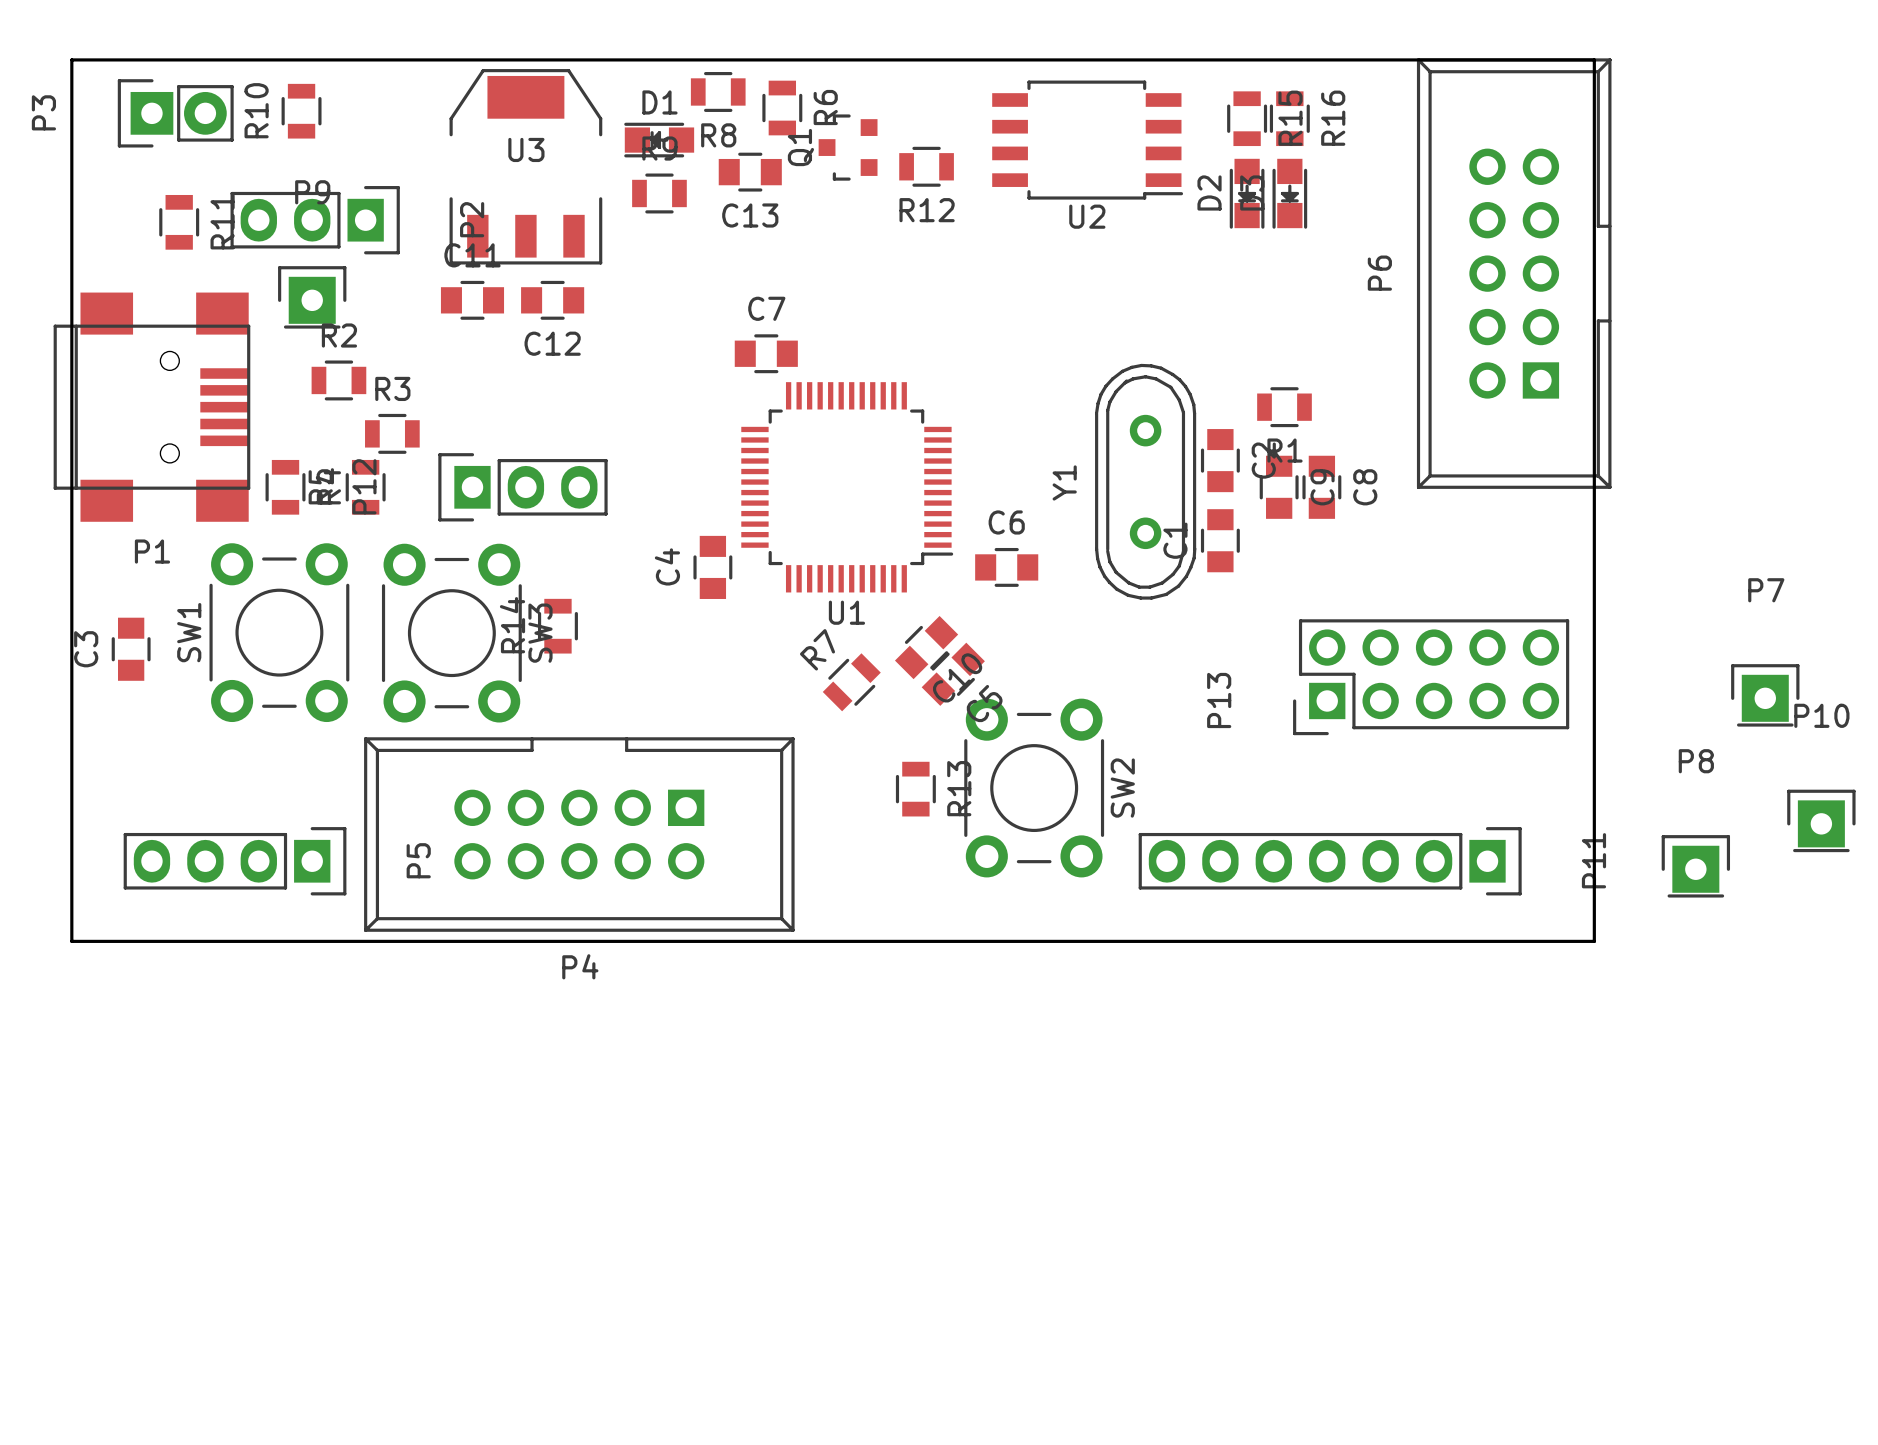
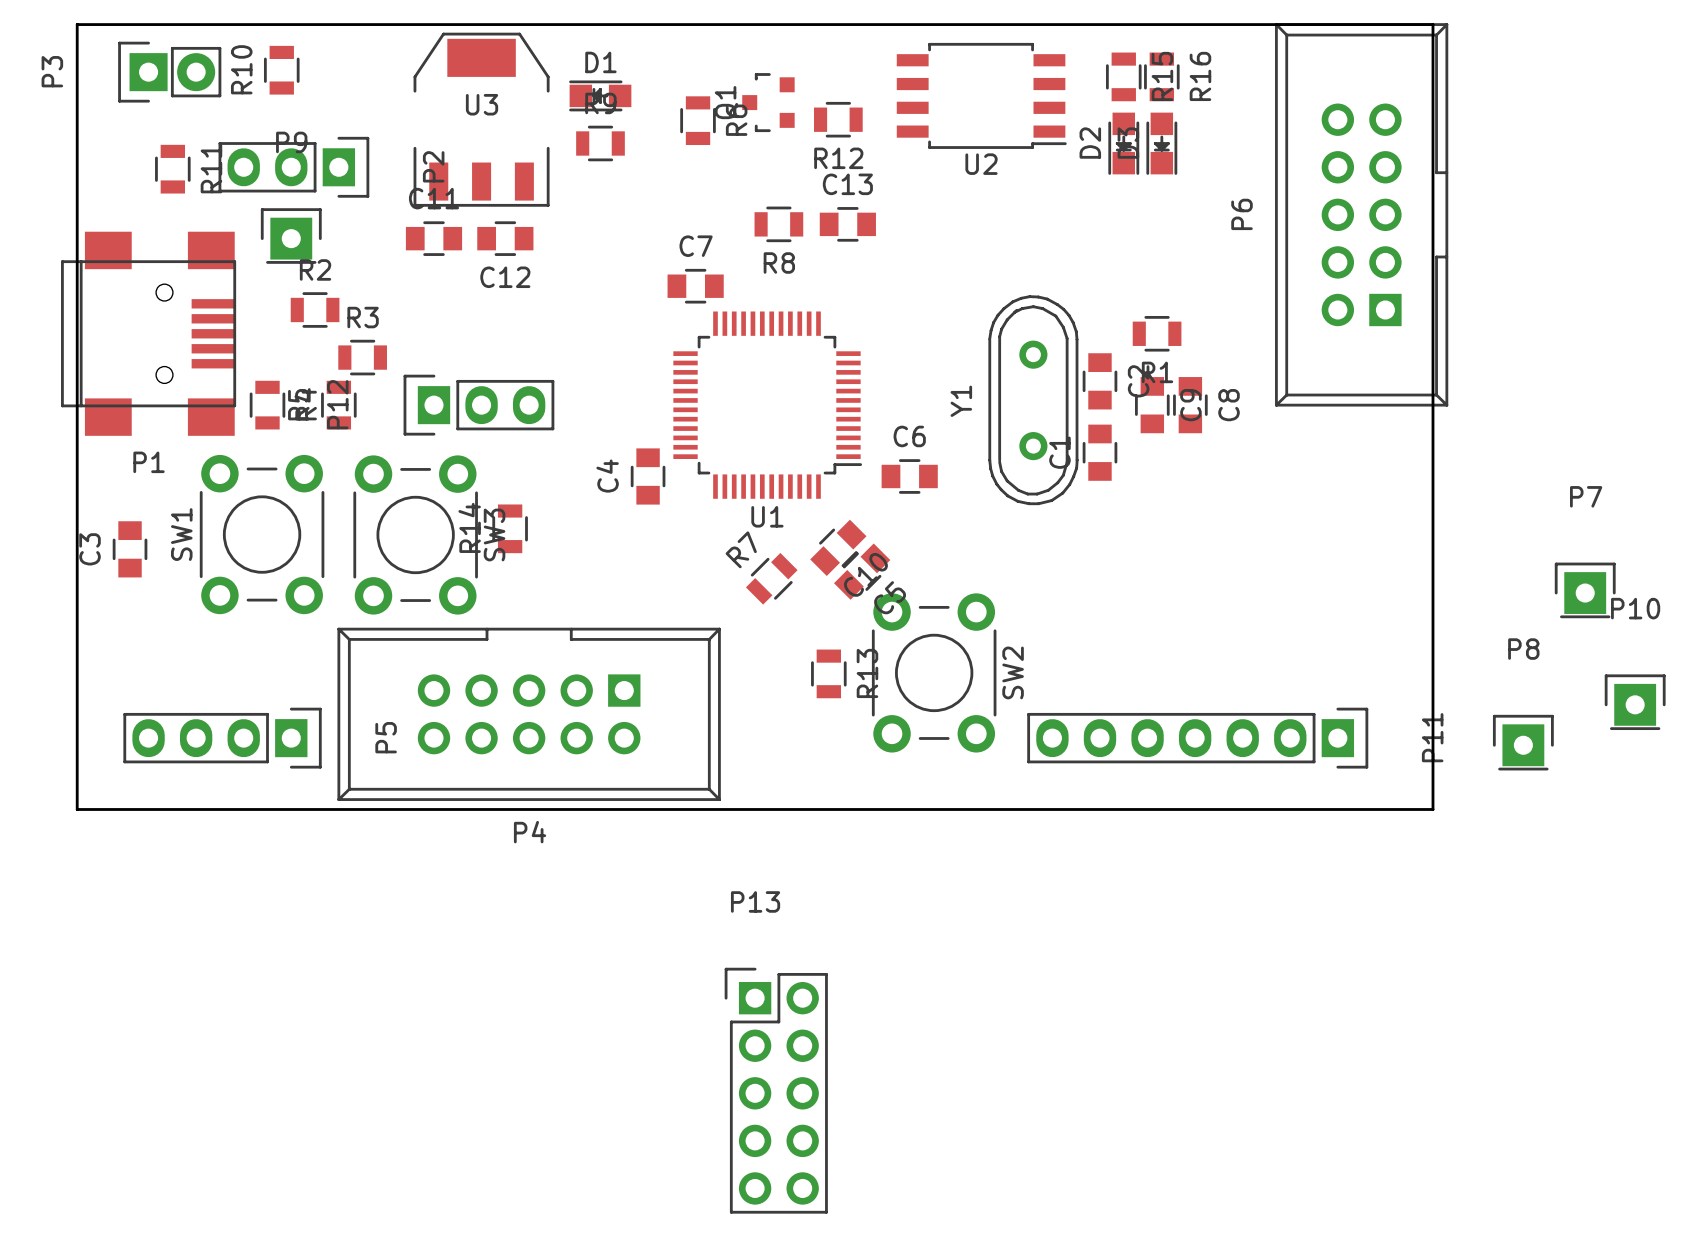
R8 position: (718, 91) -> (778, 224)
R6 position: (782, 108) -> (698, 120)
C13 position: (750, 172) -> (847, 224)
C13 name position: C13 (750, 215) -> C13 (847, 184)
P13 rotation: 0° (1431, 677) -> 90° clockwise (776, 1090)
P13 position: (1431, 677) -> (776, 1090)

